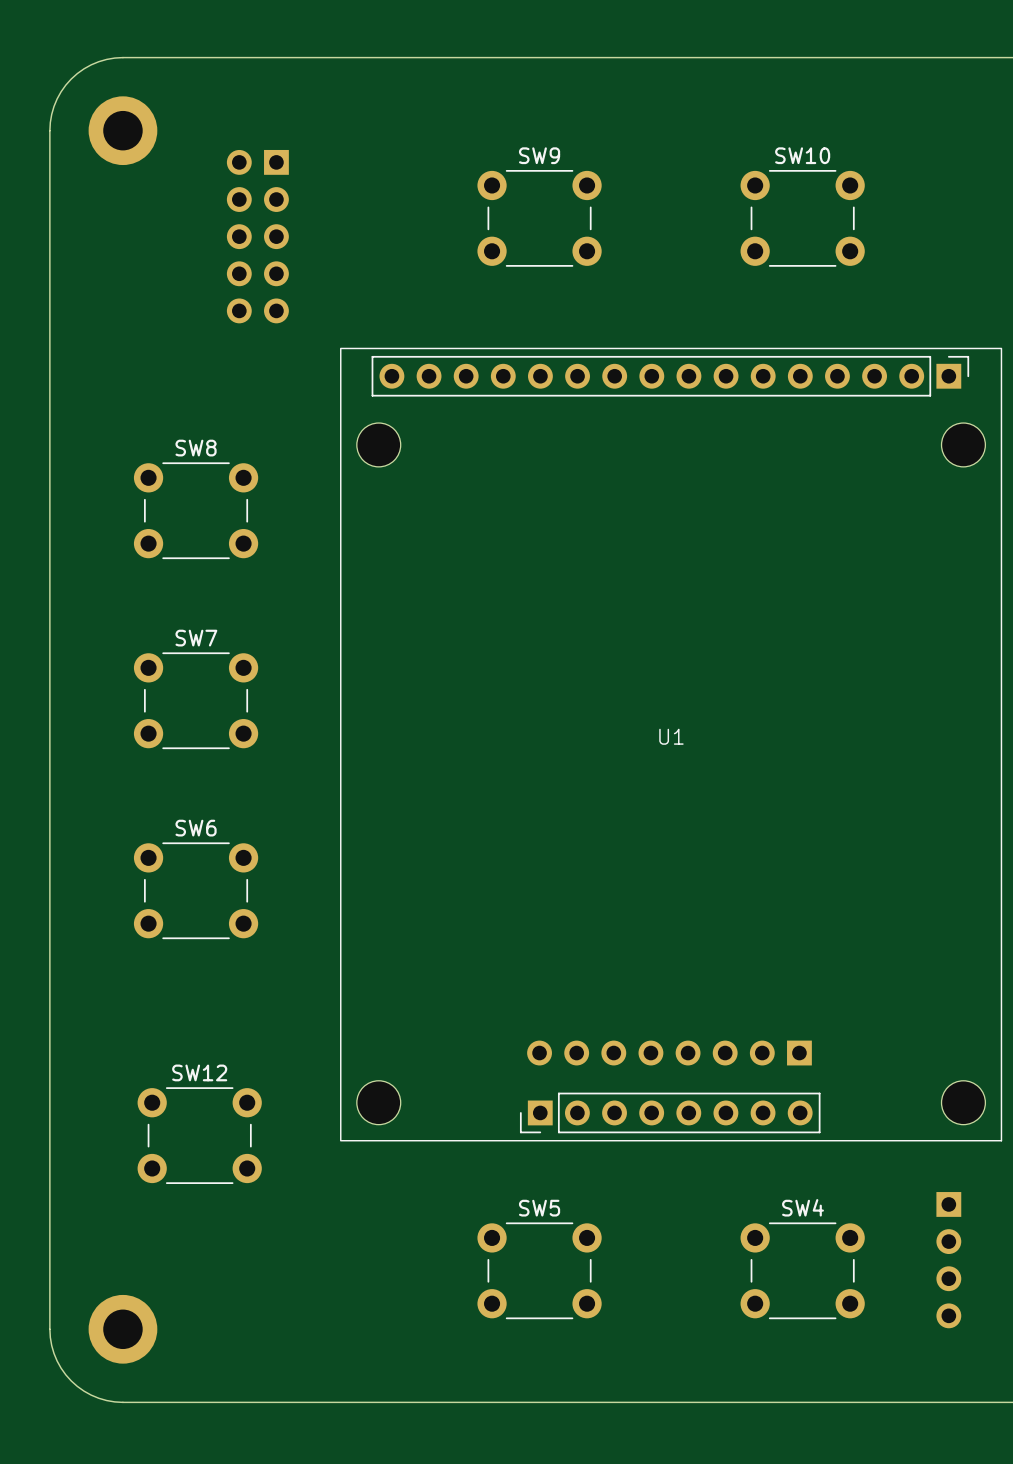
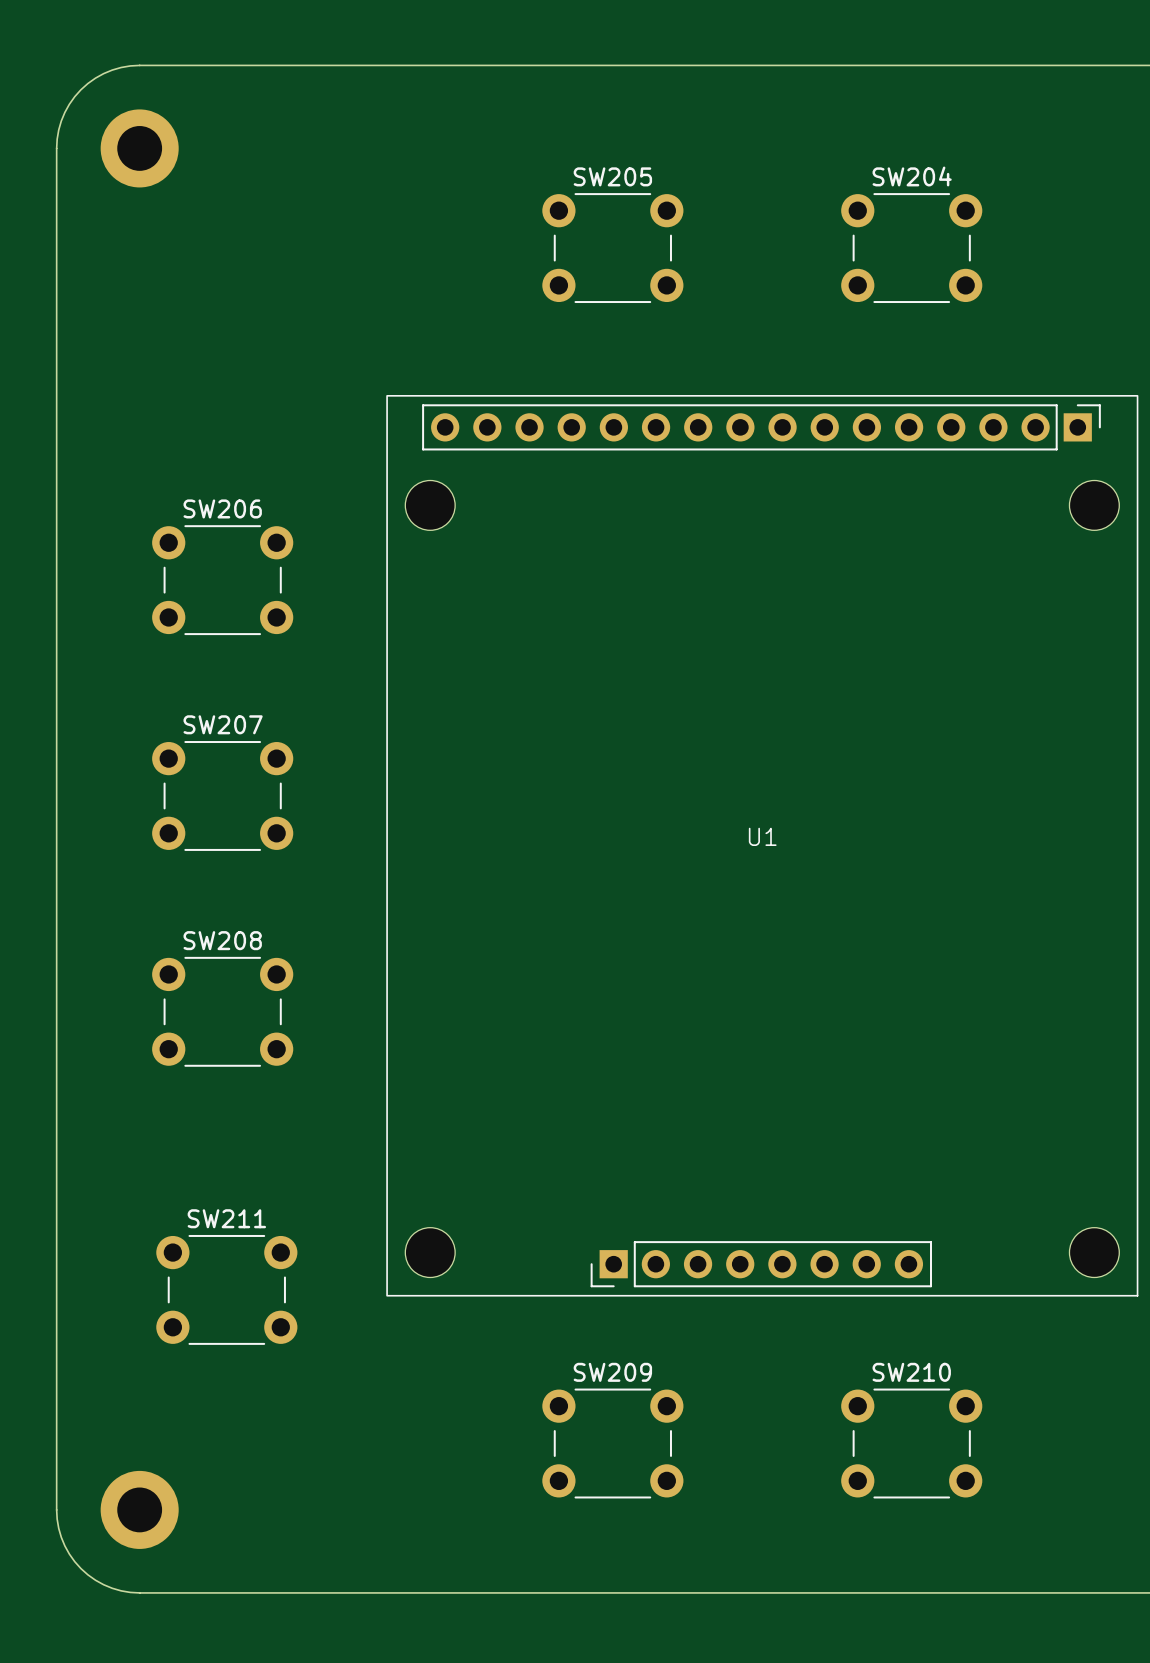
SW9 name: SW9 (539, 155) -> SW205 (612, 176)
SW10 name: SW10 (802, 155) -> SW204 (912, 176)
part: (257, 236) -> none
SW8 name: SW8 (196, 448) -> SW206 (222, 508)
SW7 name: SW7 (196, 638) -> SW207 (223, 724)
SW6 name: SW6 (196, 828) -> SW208 (222, 940)
part: (669, 1053) -> none
SW12 name: SW12 (199, 1072) -> SW211 (226, 1218)
SW4 name: SW4 (803, 1207) -> SW210 (911, 1372)
SW5 name: SW5 (539, 1208) -> SW209 (612, 1372)
part: (948, 1260) -> none

